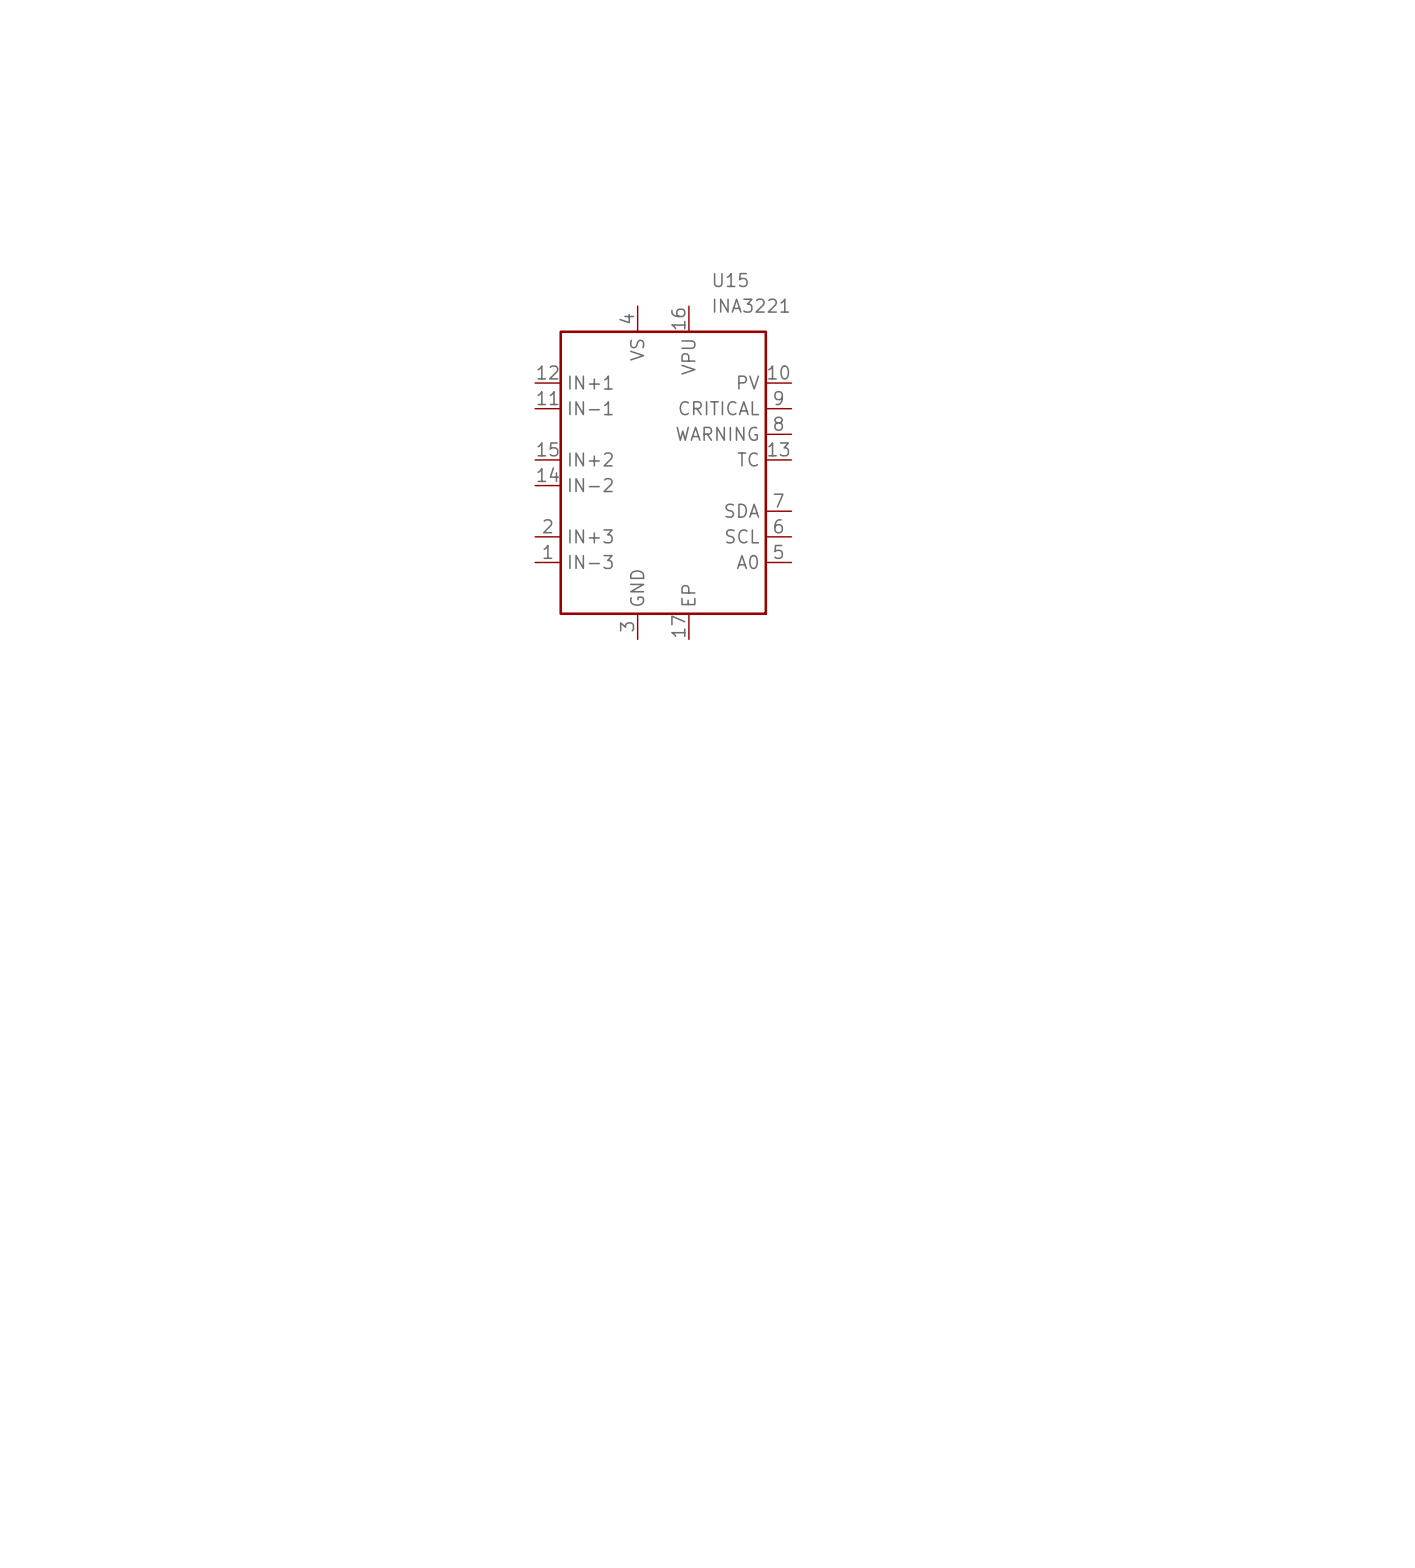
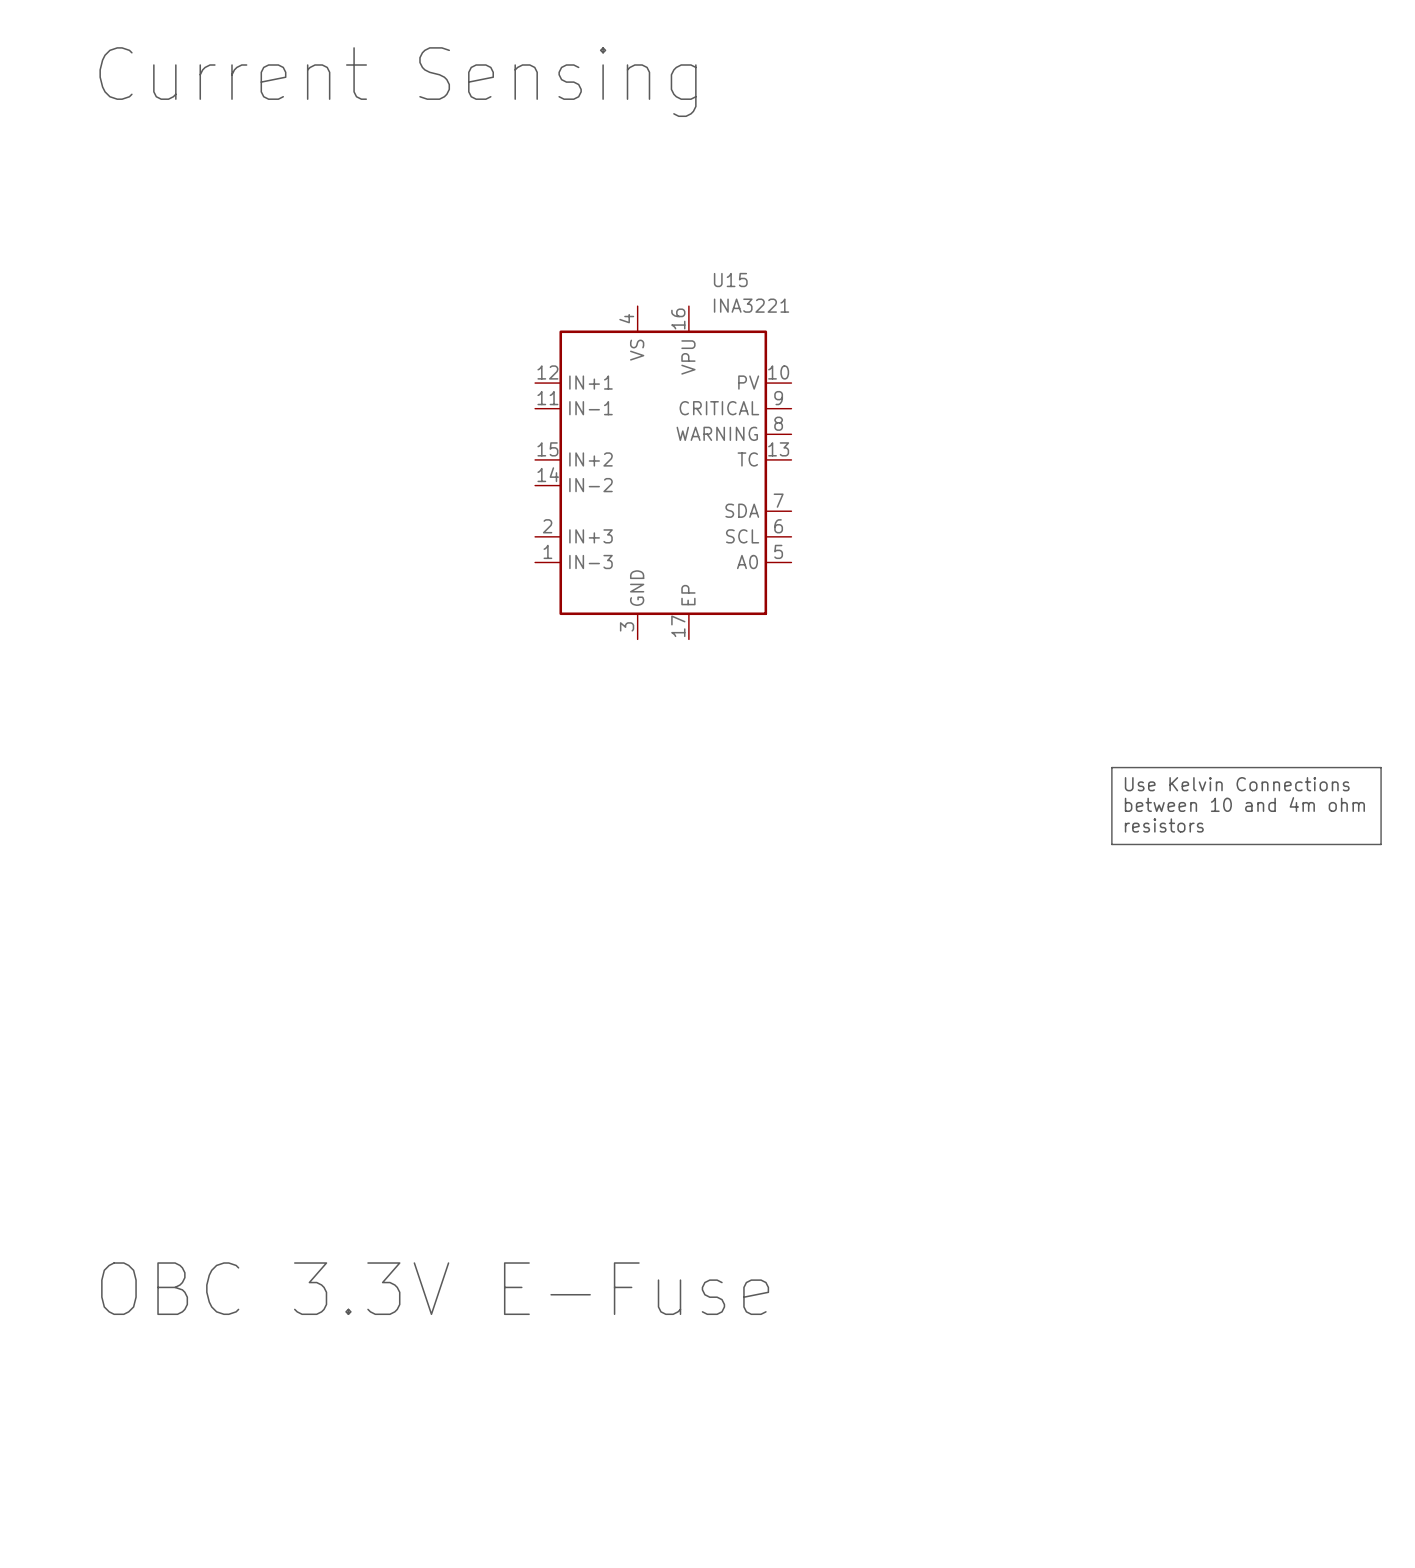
text: none -> Current Sensing (398, 82)
line: none -> (1111, 767) (1381, 767) (1381, 844) (1111, 844) (1111, 767)
text: none -> Use Kelvin Connections (1237, 784)
text: none -> between 10 and 4m ohm (1244, 804)
text: none -> resistors (1164, 825)
text: none -> OBC 3.3V E-Fuse (435, 1288)

